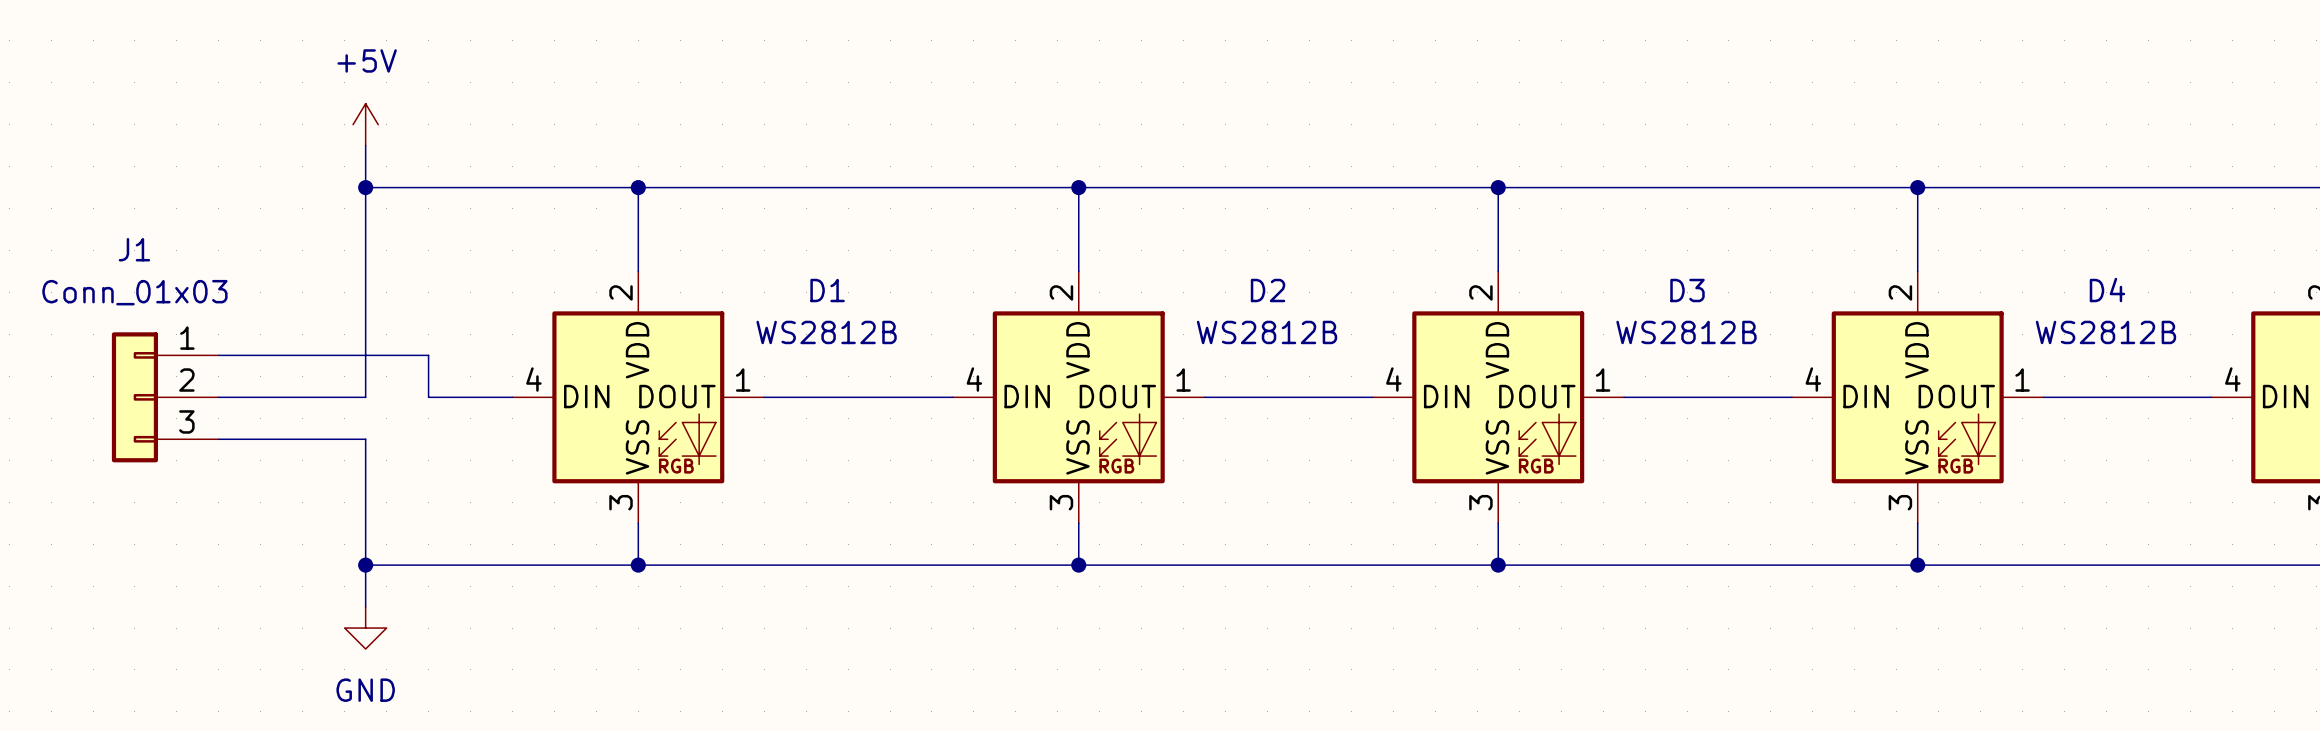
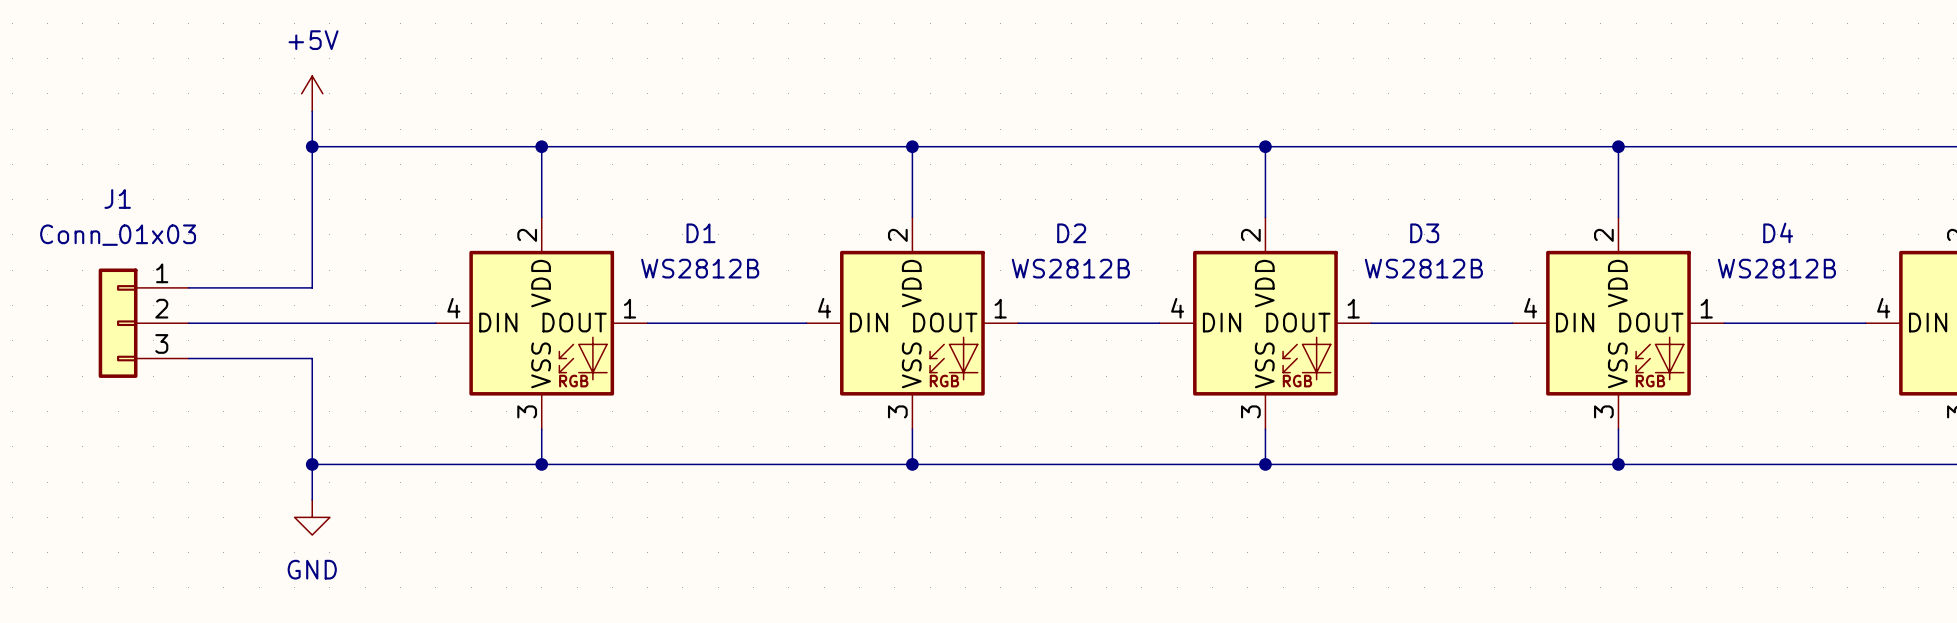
wire: (365, 397) (365, 355) (428, 355) (428, 397) -> (312, 323) (365, 323)

